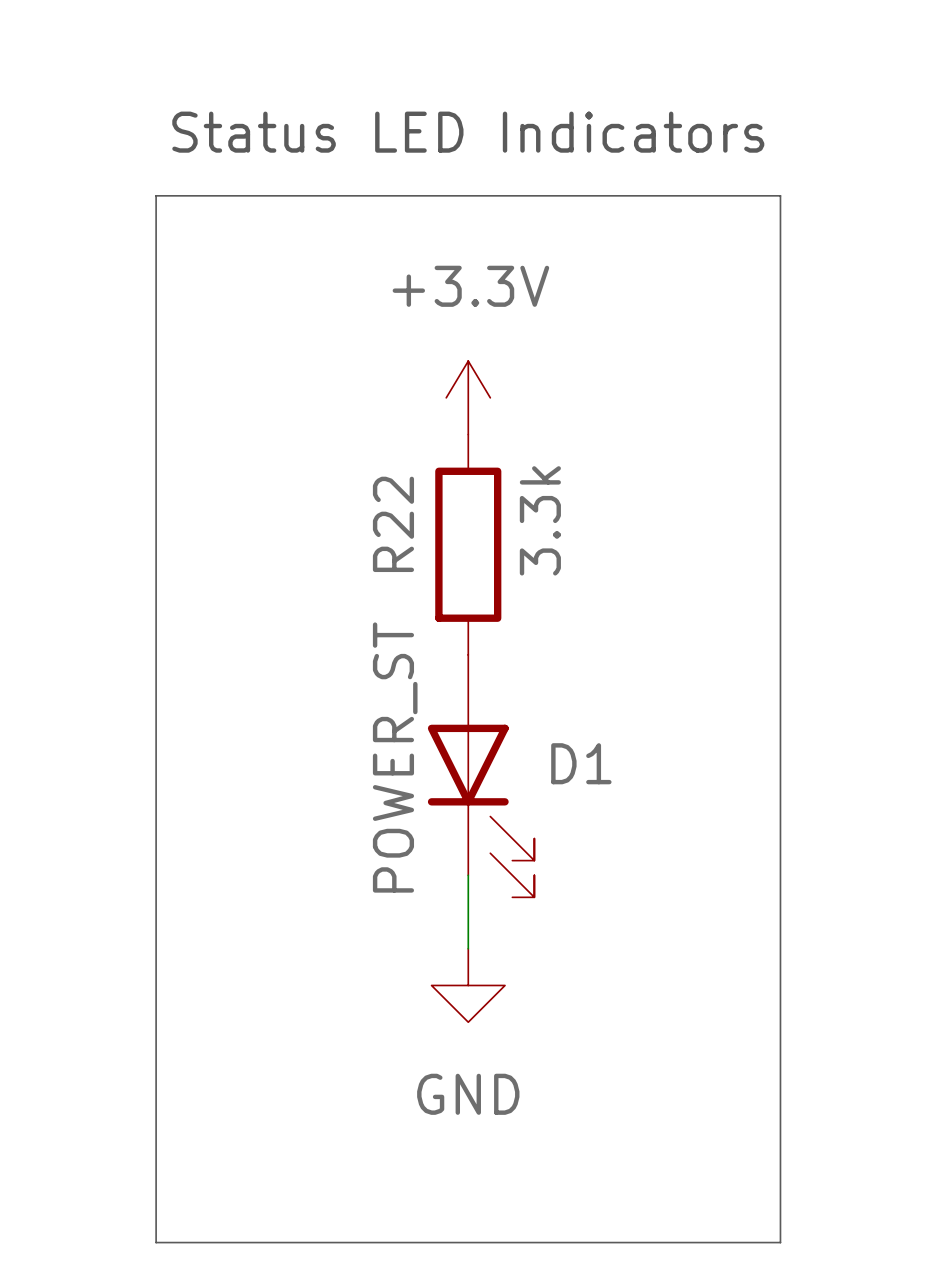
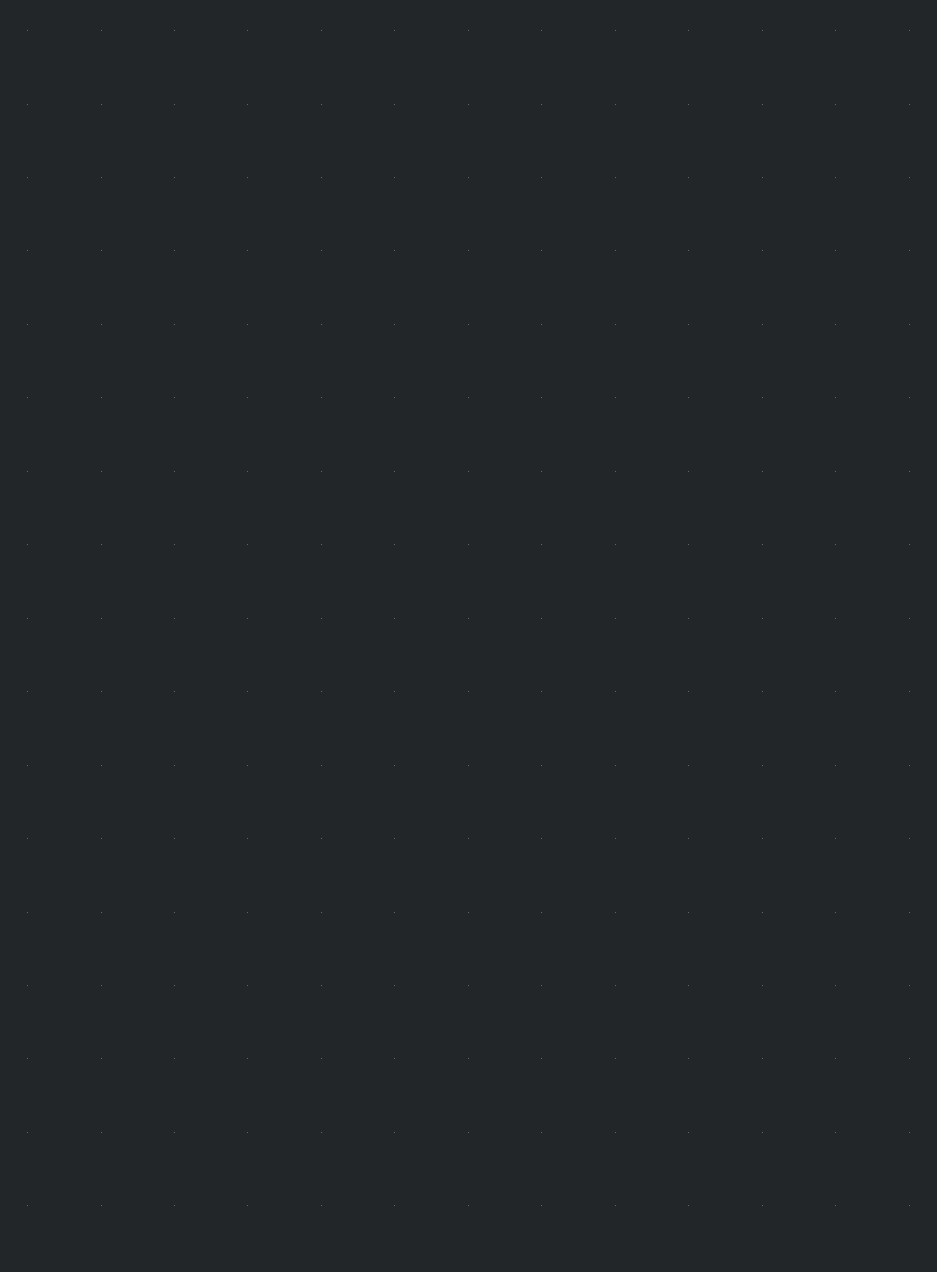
text: Status LED Indicators (468, 132) -> none
line: (156, 195) (780, 195) (780, 1242) (156, 1242) (156, 195) -> none
power symbol: +3.3V (468, 397) -> none
R22: 3.3k (468, 544) -> none
D1: POWER_ST (481, 776) -> none
wire: (468, 875) (468, 948) -> none
power symbol: GND (468, 985) -> none

